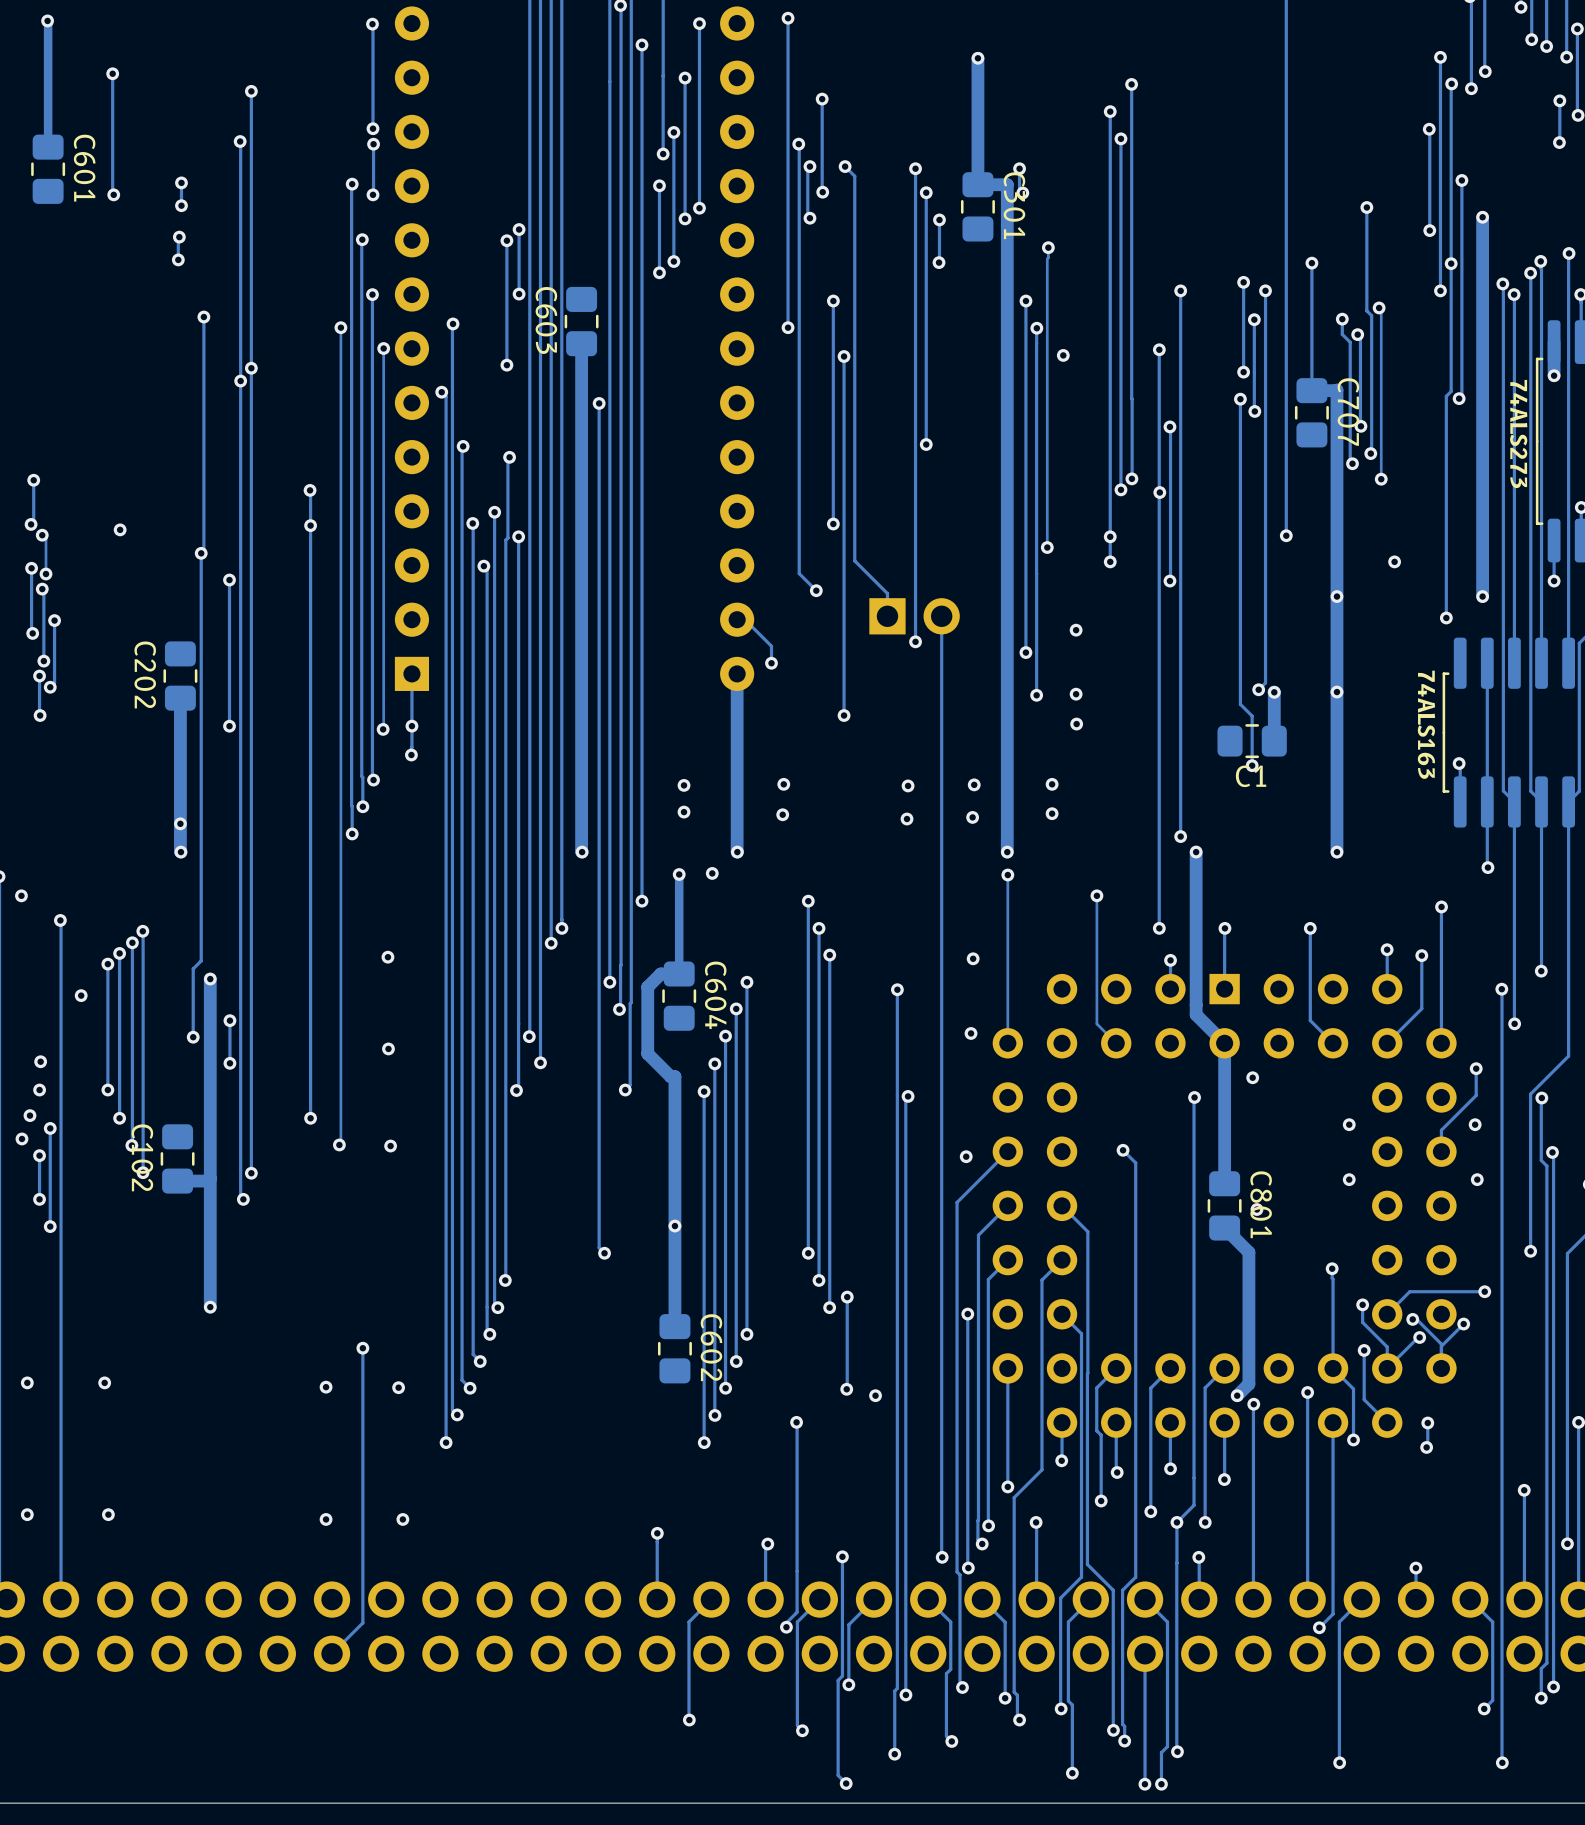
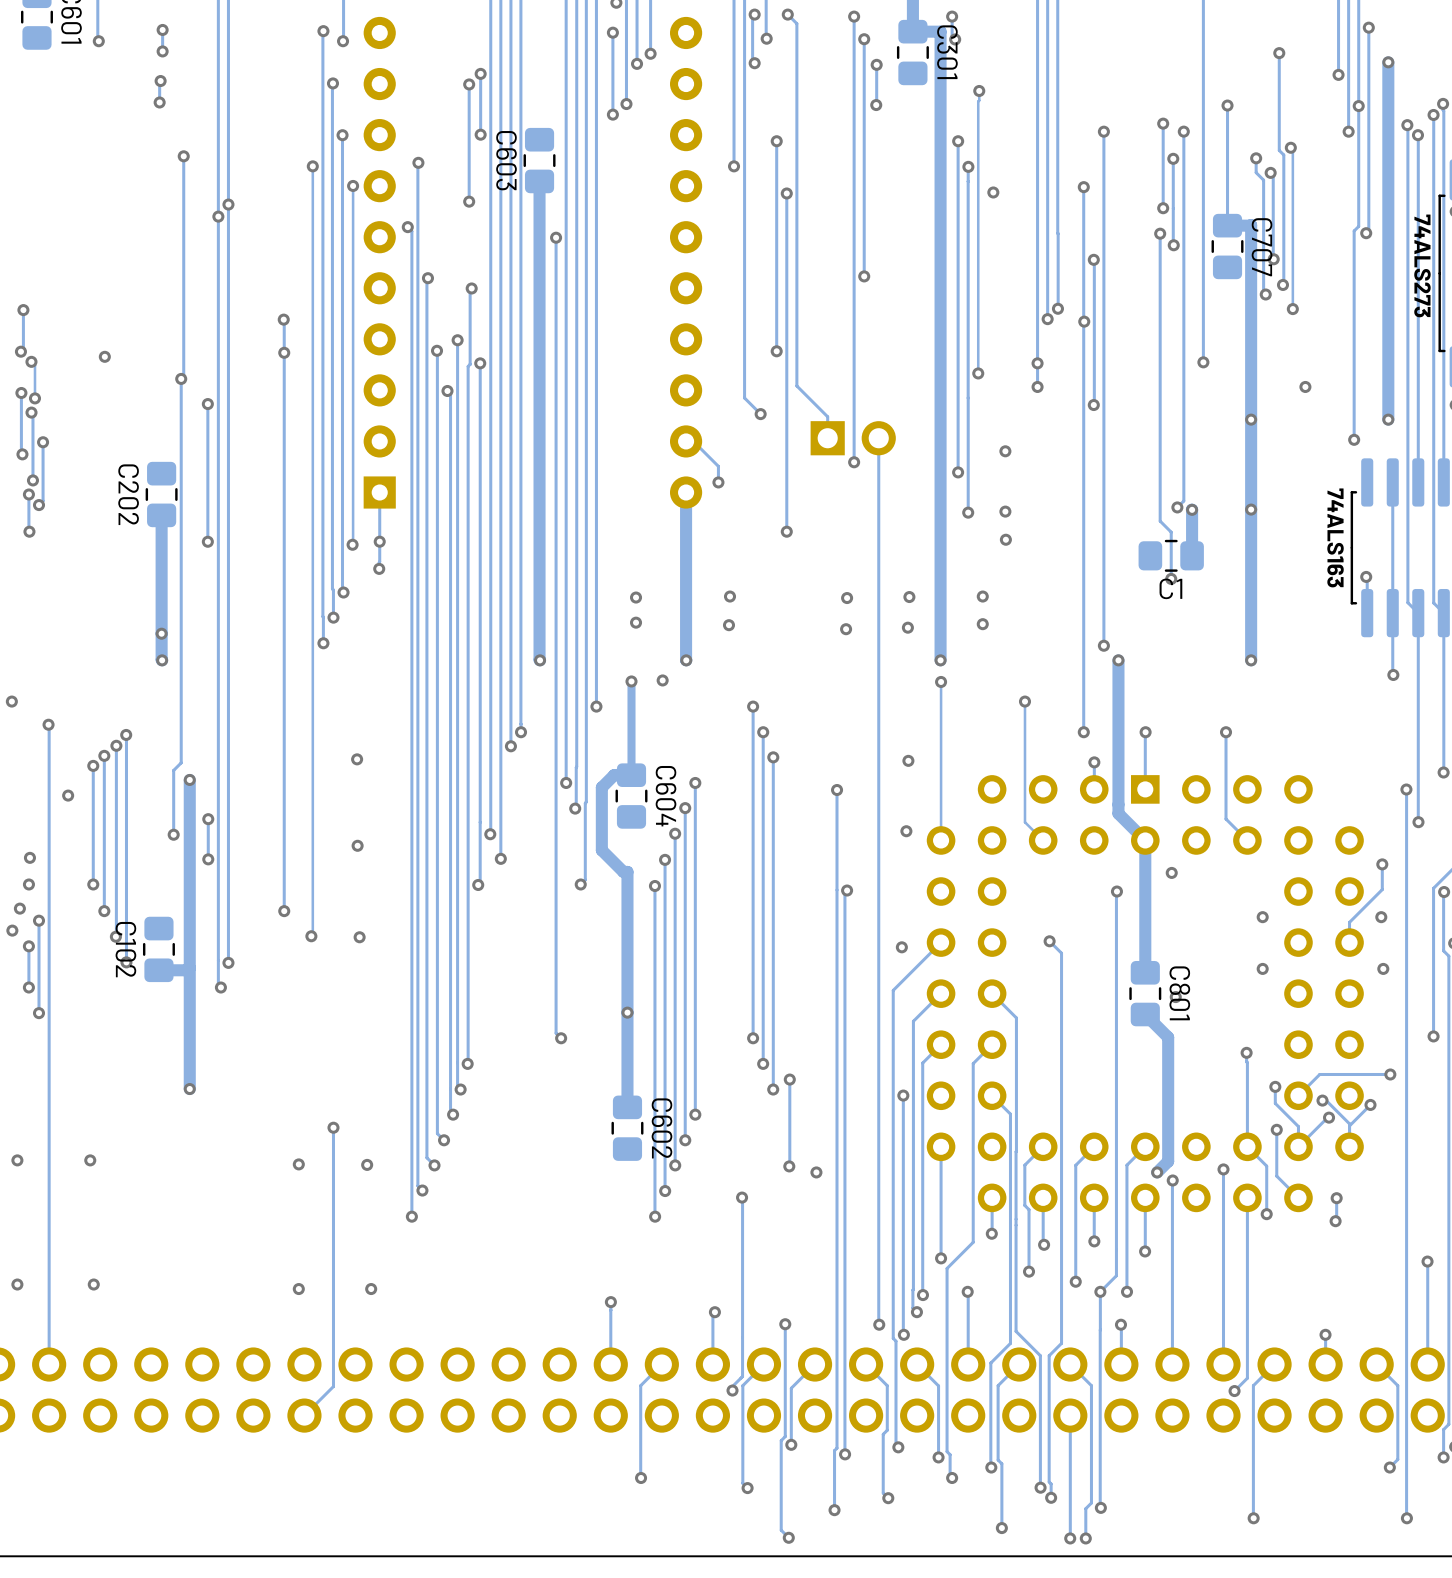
via: (1441, 906) -> none
track: (1441, 907) (1441, 1043) -> none
track: (1387, 949) (1387, 989) -> none
via: (1387, 949) -> none
track: (1421, 955) (1421, 1008) (1387, 1043) -> none
via: (1421, 955) -> none

